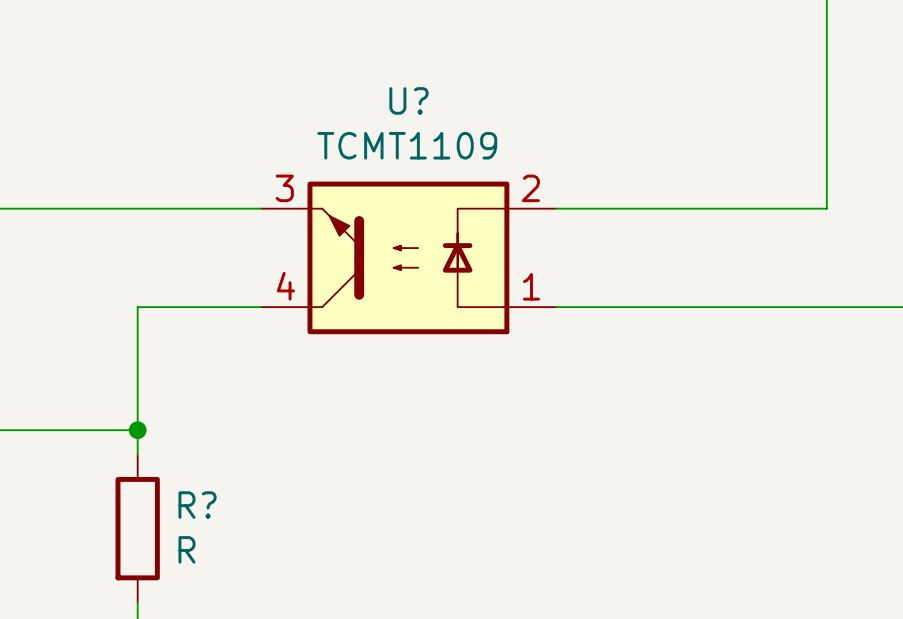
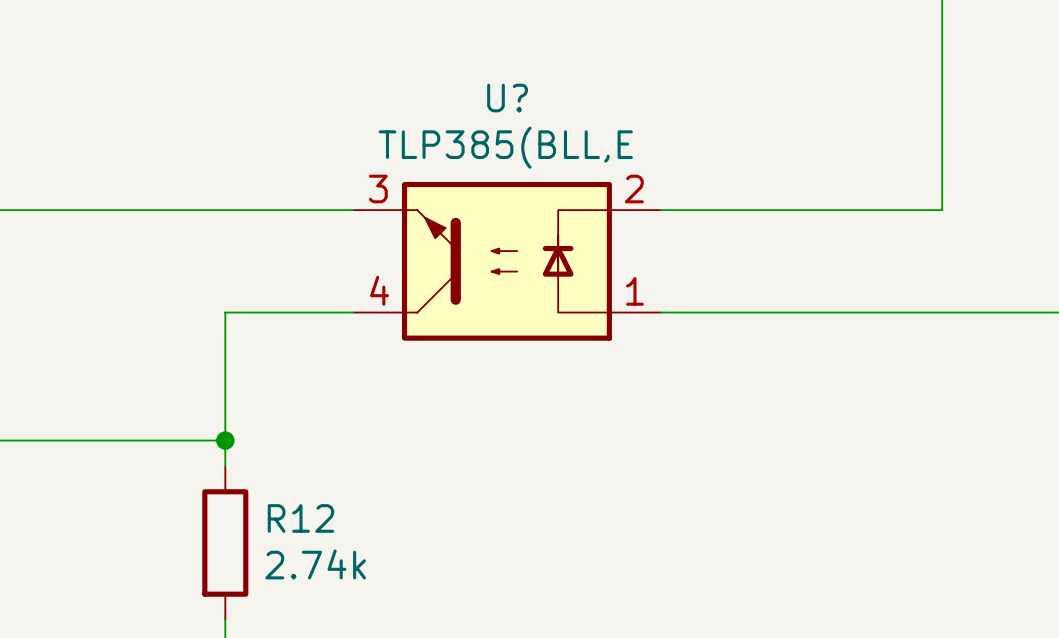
U? value: TCMT1109 (407, 145) -> TLP385(BLL,E (505, 147)
R? name: R? (197, 505) -> R12 (300, 518)
R? value: R (186, 549) -> 2.74k (315, 564)

